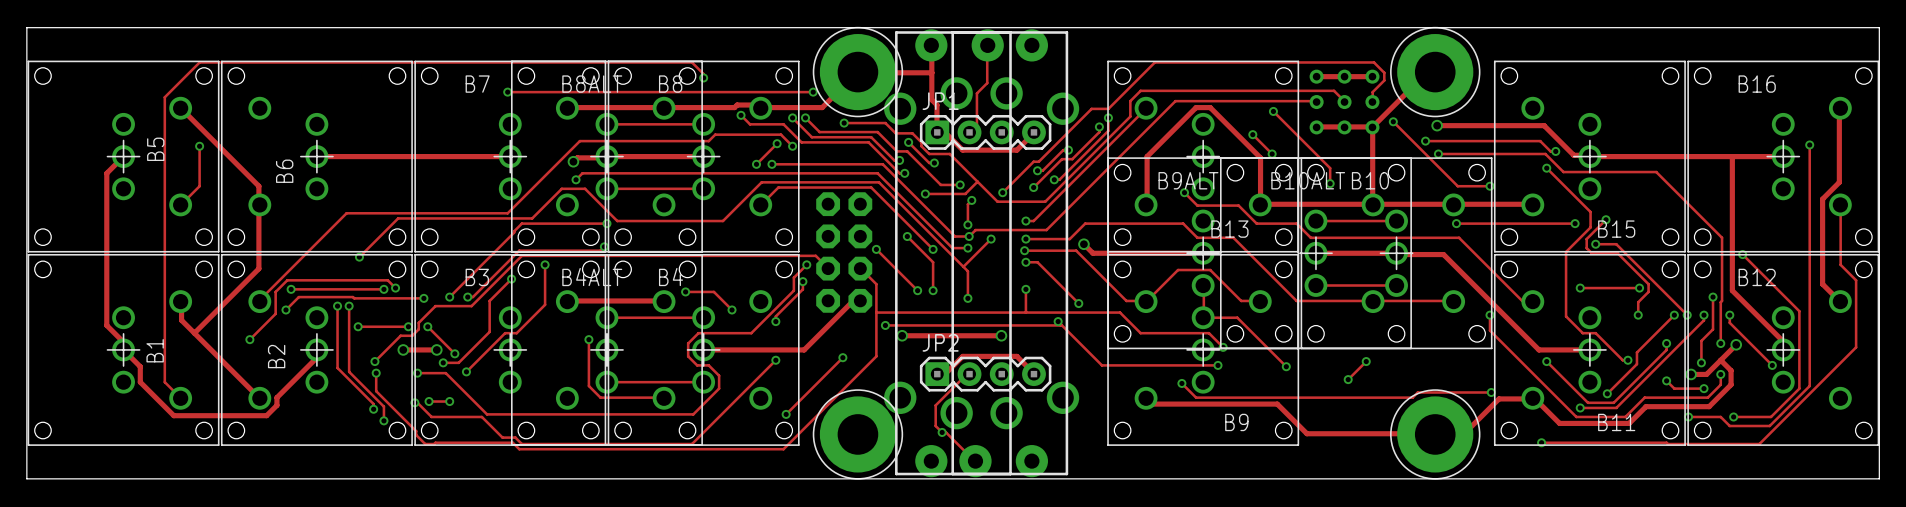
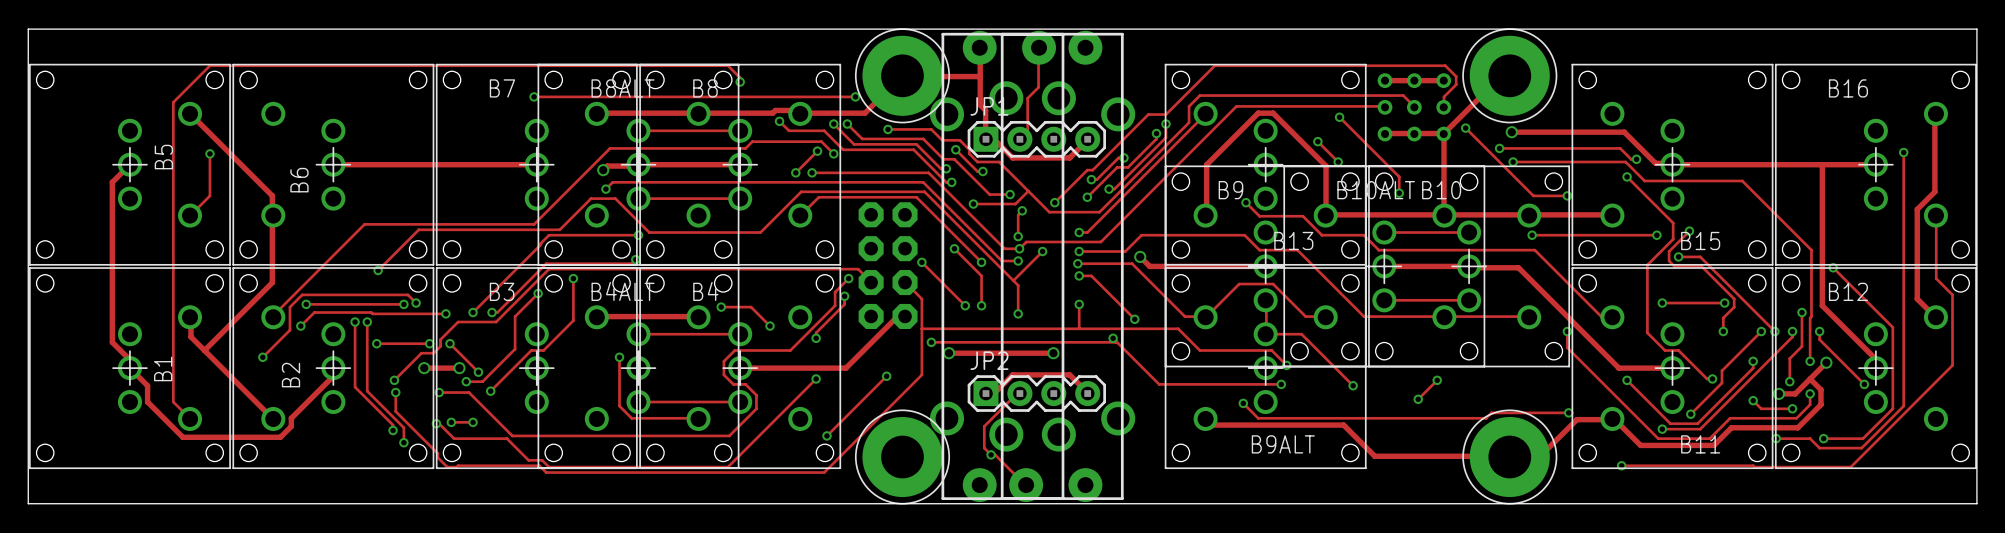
B9ALT name: B9ALT (1188, 180) -> B9 (1230, 190)
B9 name: B9 (1236, 422) -> B9ALT (1283, 444)

